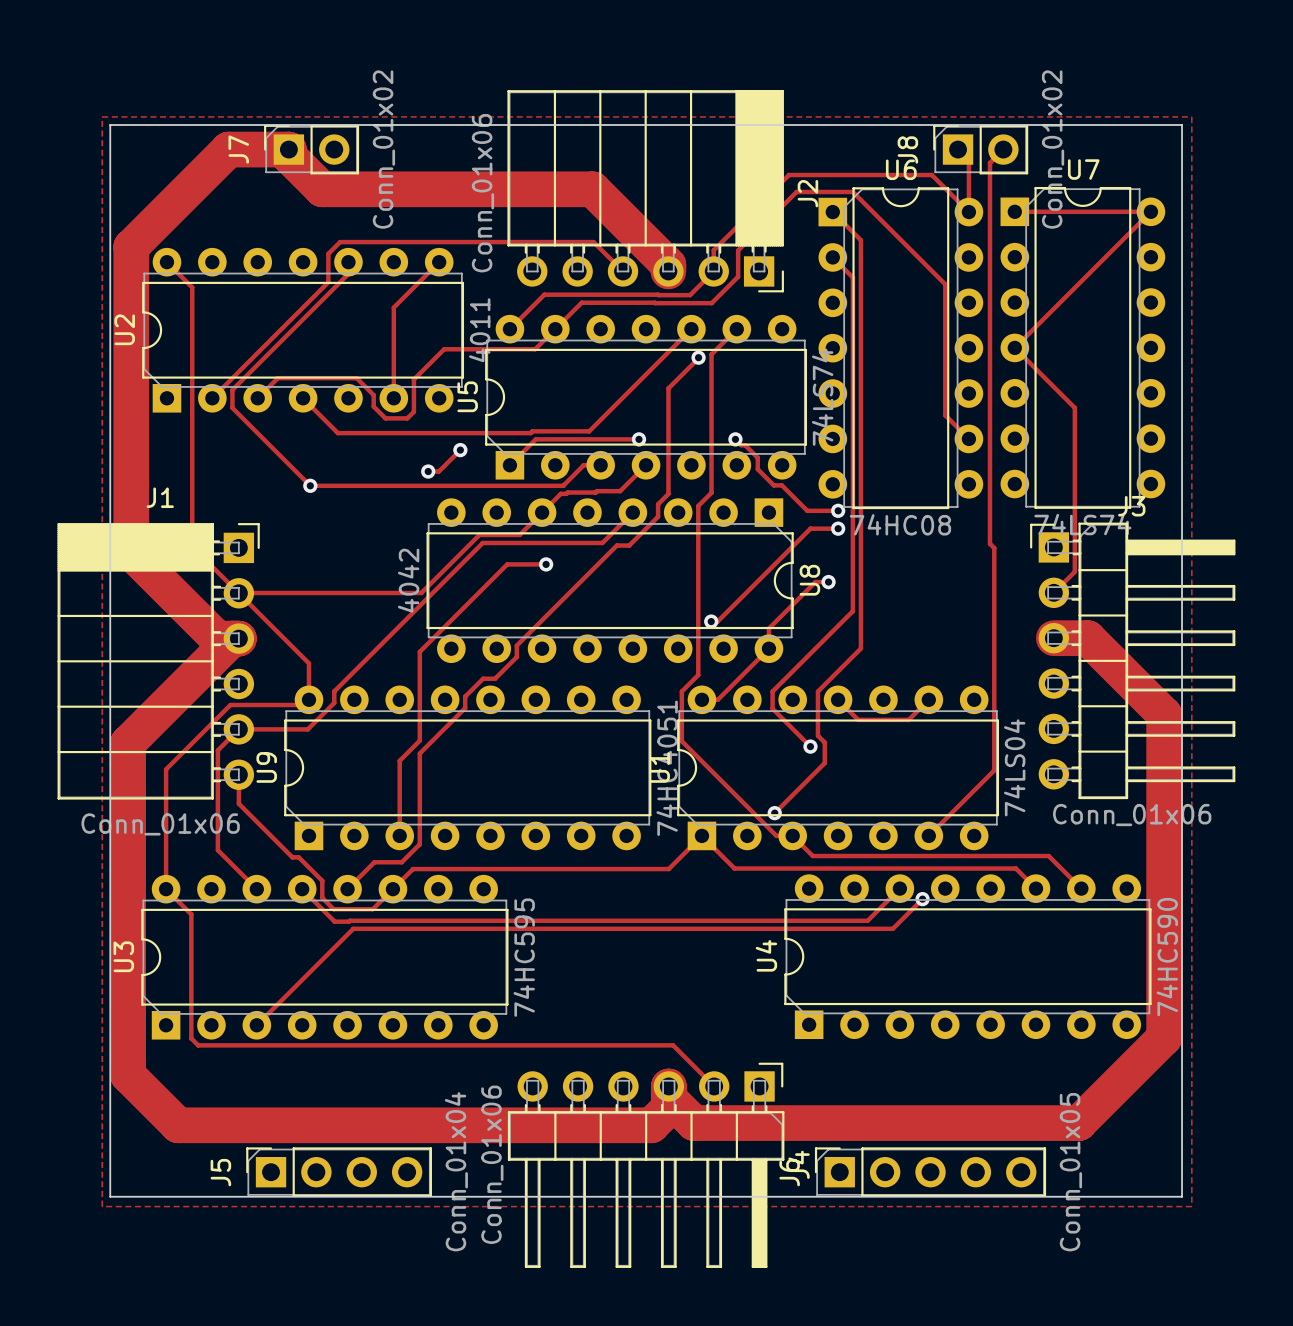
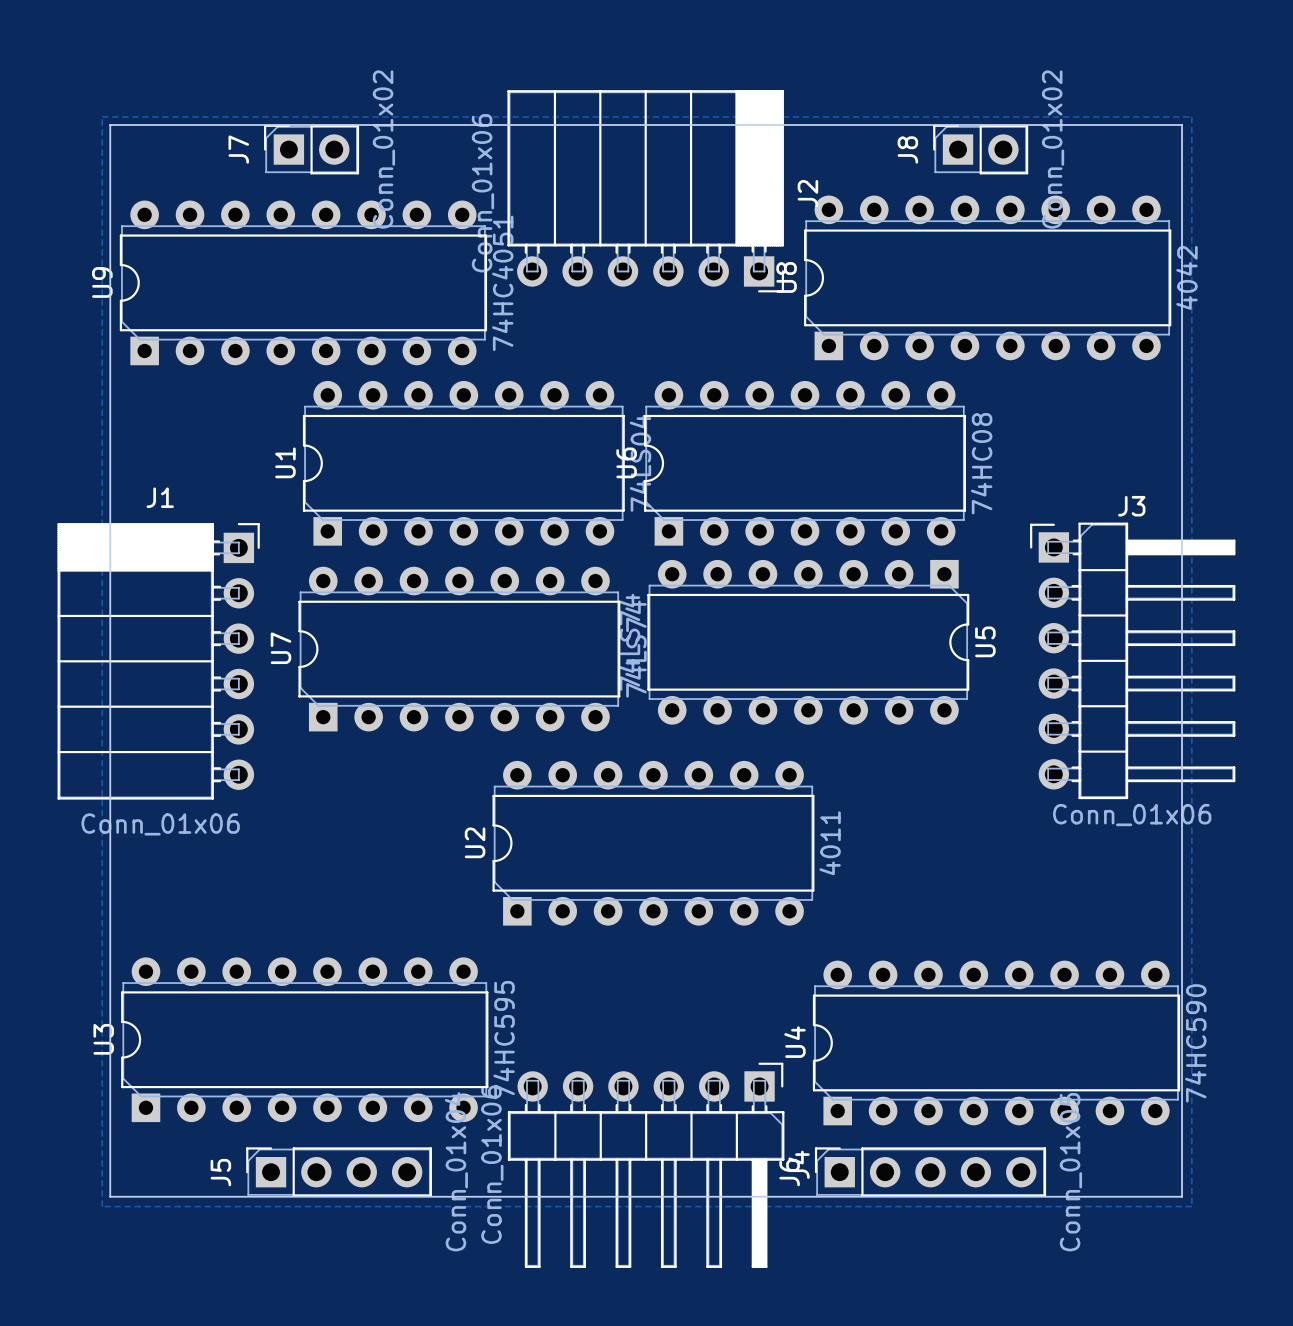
track: (958, 149) (968, 160) (968, 212) (931, 175) (789, 175) (713, 250) (713, 271) (690, 295) (544, 294) (509, 329) -> none
track: (1003, 149) (989, 162) (989, 543) (994, 548) (994, 770) (928, 835) -> none
track: (832, 212) (860, 240) (860, 648) (817, 691) (817, 735) (824, 742) (824, 763) (774, 813) -> none
track: (1014, 212) (1150, 211) (1014, 347) (1074, 407) (1074, 571) (1053, 592) -> none
track: (832, 257) (852, 277) (852, 611) (772, 691) (772, 708) (810, 746) -> none
track: (166, 262) (192, 287) (192, 546) (308, 663) (308, 699) (303, 704) (230, 704) (166, 769) (166, 889) (191, 914) (191, 1038) (198, 1045) (673, 1045) (714, 1086) -> none
track: (348, 262) (348, 273) (232, 389) (232, 407) (310, 485) (563, 485) (583, 465) (600, 465) -> none
track: (439, 262) (393, 307) (393, 398) -> none
track: (623, 271) (593, 242) (340, 242) (328, 253) (328, 282) (212, 398) -> none
track: (668, 271) (668, 265) (592, 189) (322, 189) (288, 155) (288, 149) (228, 149) (131, 246) (131, 552) (217, 638) (238, 638) -> none
track: (691, 329) (589, 431) (337, 433) (303, 398) -> none
track: (736, 329) (711, 354) (711, 492) (698, 506) (698, 675) (681, 691) (681, 741) (776, 835) (792, 835) (812, 856) (1048, 856) (1081, 888) -> none
U2 position: (303, 330) -> (653, 843)
U7 rotation: 0° (1082, 347) -> 90° counterclockwise (459, 649)
U7 position: (1082, 347) -> (459, 649)
U6 rotation: 0° (900, 348) -> 90° counterclockwise (805, 463)
track: (698, 357) (668, 388) (668, 493) (658, 504) (658, 516) (629, 545) (616, 545) (516, 645) (516, 657) (495, 678) (483, 678) (465, 696) (465, 708) (419, 753) (419, 844) (401, 862) (374, 862) (347, 889) -> none
via: (698, 357) -> none
U5 rotation: 0° (646, 397) -> 180° (808, 642)
U5 position: (646, 397) -> (808, 642)
track: (257, 398) (277, 378) (356, 378) (373, 395) (373, 406) (385, 418) (407, 418) (413, 411) (413, 379) (444, 349) (535, 349) (581, 302) (711, 303) (738, 276) (738, 250) (796, 191) (852, 191) (945, 284) (945, 415) (968, 438) -> none
track: (638, 439) (535, 439) (509, 465) -> none
via: (638, 439) -> none
track: (735, 439) (741, 445) (745, 445) (757, 457) (757, 469) (773, 485) (781, 485) (807, 510) (838, 510) -> none
via: (735, 439) -> none
track: (460, 450) (438, 471) (428, 471) -> none
via: (460, 450) -> none
track: (646, 465) (620, 491) (560, 493) (519, 534) (479, 534) (421, 592) (238, 593) -> none
via: (428, 471) -> none
via: (310, 485) -> none
via: (838, 510) -> none
track: (632, 512) (602, 542) (482, 542) (334, 691) (334, 702) (307, 729) (238, 729) (217, 750) (217, 850) (256, 889) -> none
track: (838, 528) (810, 528) (717, 621) (711, 621) -> none
via: (838, 528) -> none
track: (546, 564) (507, 564) (419, 651) (419, 740) (399, 760) (399, 835) -> none
via: (546, 564) -> none
U8 rotation: 0° (610, 580) -> 180° (987, 277)
U8 position: (610, 580) -> (987, 277)
track: (828, 582) (815, 582) (768, 628) (768, 648) (717, 699) (701, 699) -> none
via: (828, 582) -> none
via: (711, 621) -> none
track: (232, 638) (128, 742) (128, 1075) (178, 1125) (651, 1125) (668, 1107) (668, 1086) -> none
track: (1053, 638) (1087, 638) (1164, 714) (1164, 1037) (1078, 1123) (693, 1123) (668, 1097) -> none
track: (838, 699) (858, 719) (908, 719) (928, 699) -> none
via: (810, 746) -> none
U9 position: (467, 767) -> (303, 282)
U1 position: (838, 767) -> (463, 463)
track: (238, 774) (238, 803) (292, 857) (298, 857) (322, 880) (322, 897) (333, 909) (372, 909) (413, 869) (668, 869) (701, 835) (734, 868) (1015, 868) (1035, 888) -> none
via: (774, 813) -> none
track: (899, 888) (867, 920) (349, 921) (334, 921) (302, 889) -> none
track: (922, 899) (892, 928) (353, 928) (256, 1025) -> none
via: (922, 899) -> none
U4 position: (967, 956) -> (996, 1042)
U3 position: (324, 957) -> (304, 1039)

